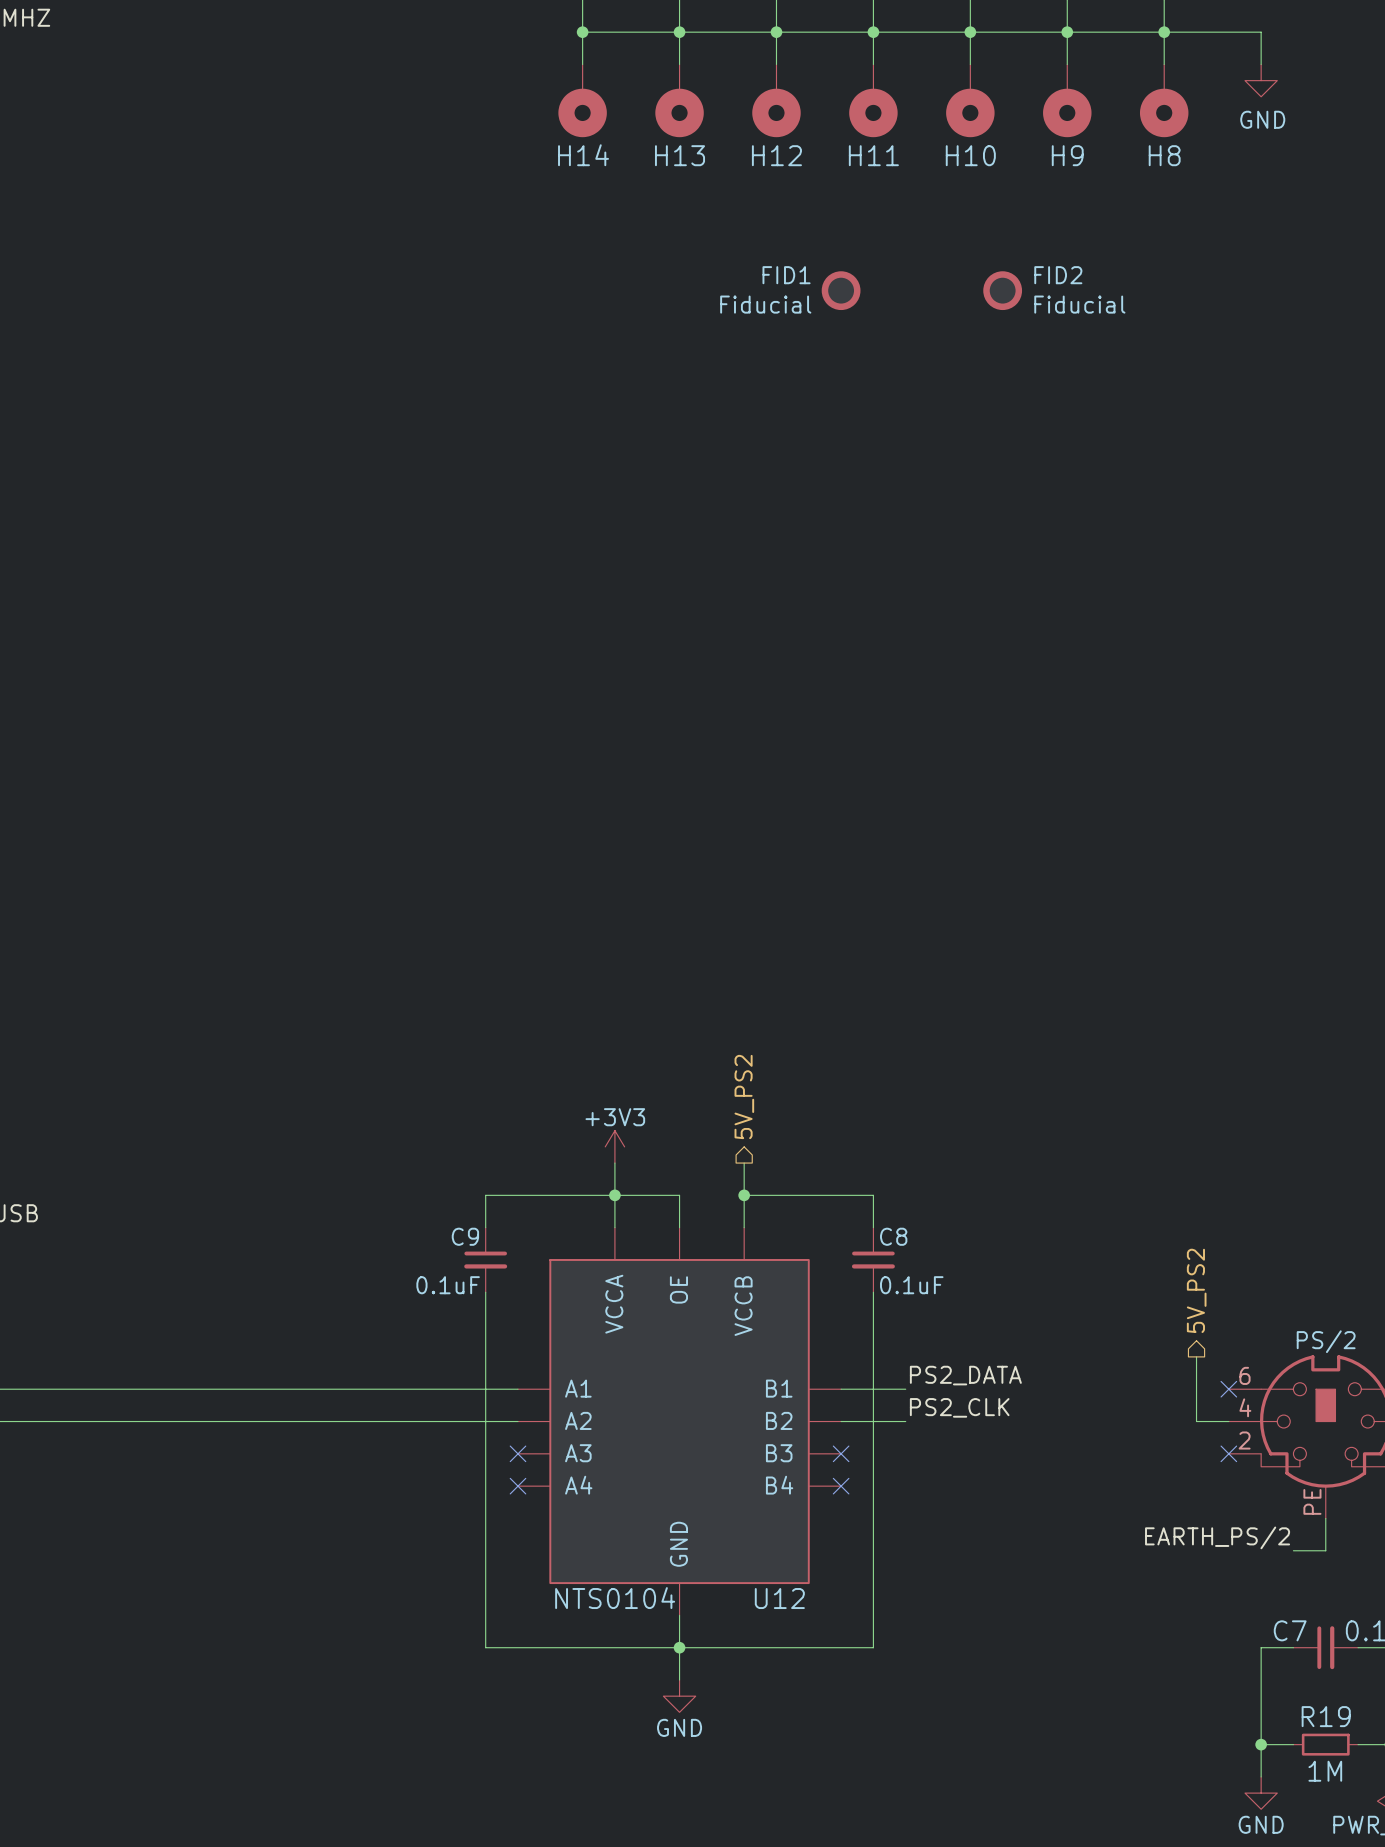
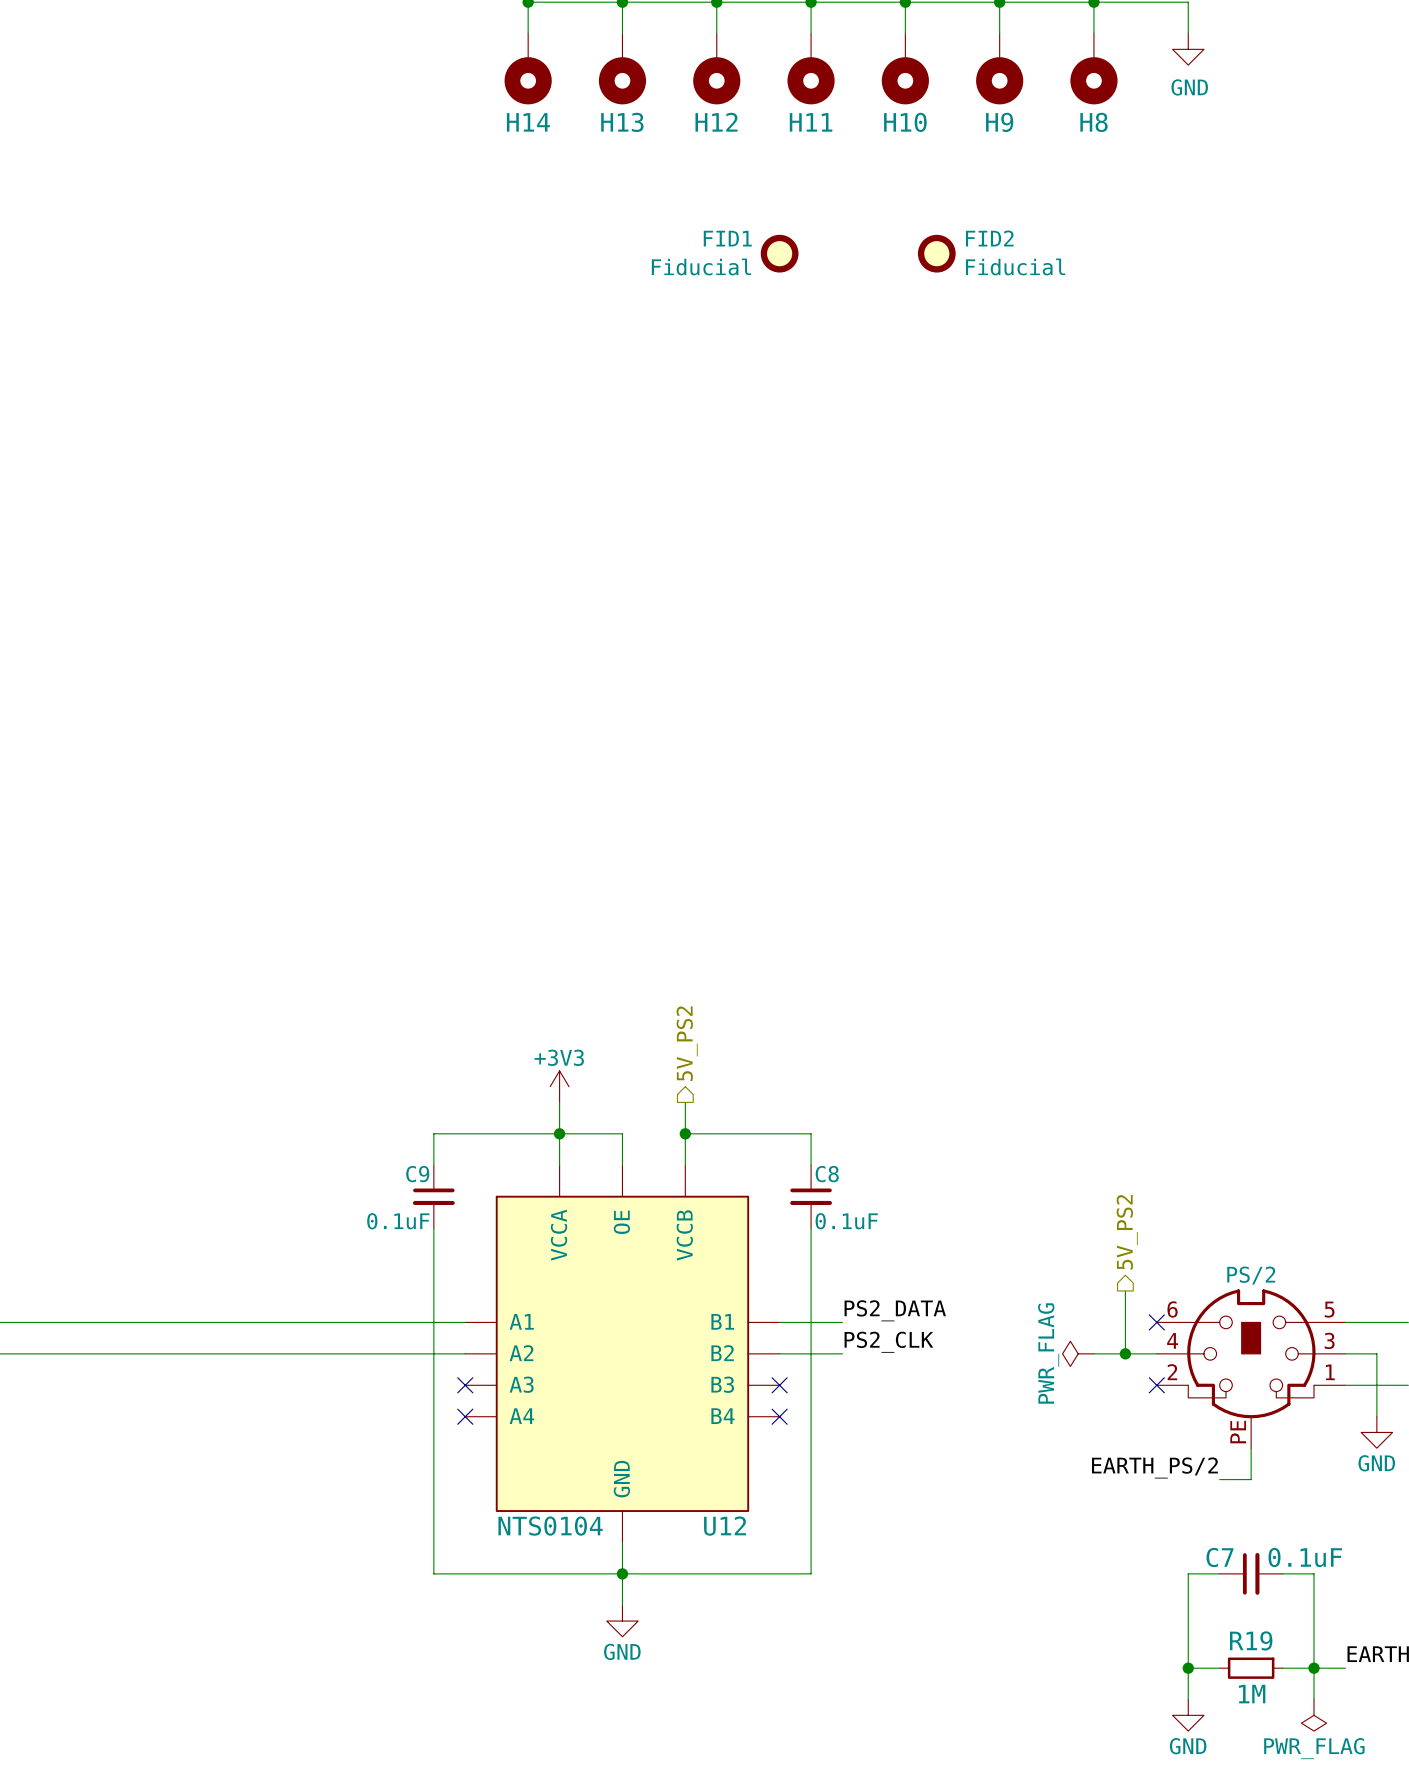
power symbol: none -> PWR_FLAG (1078, 1353)
wire: none -> (1093, 1353) (1125, 1353)
junction: none -> (1125, 1353)

